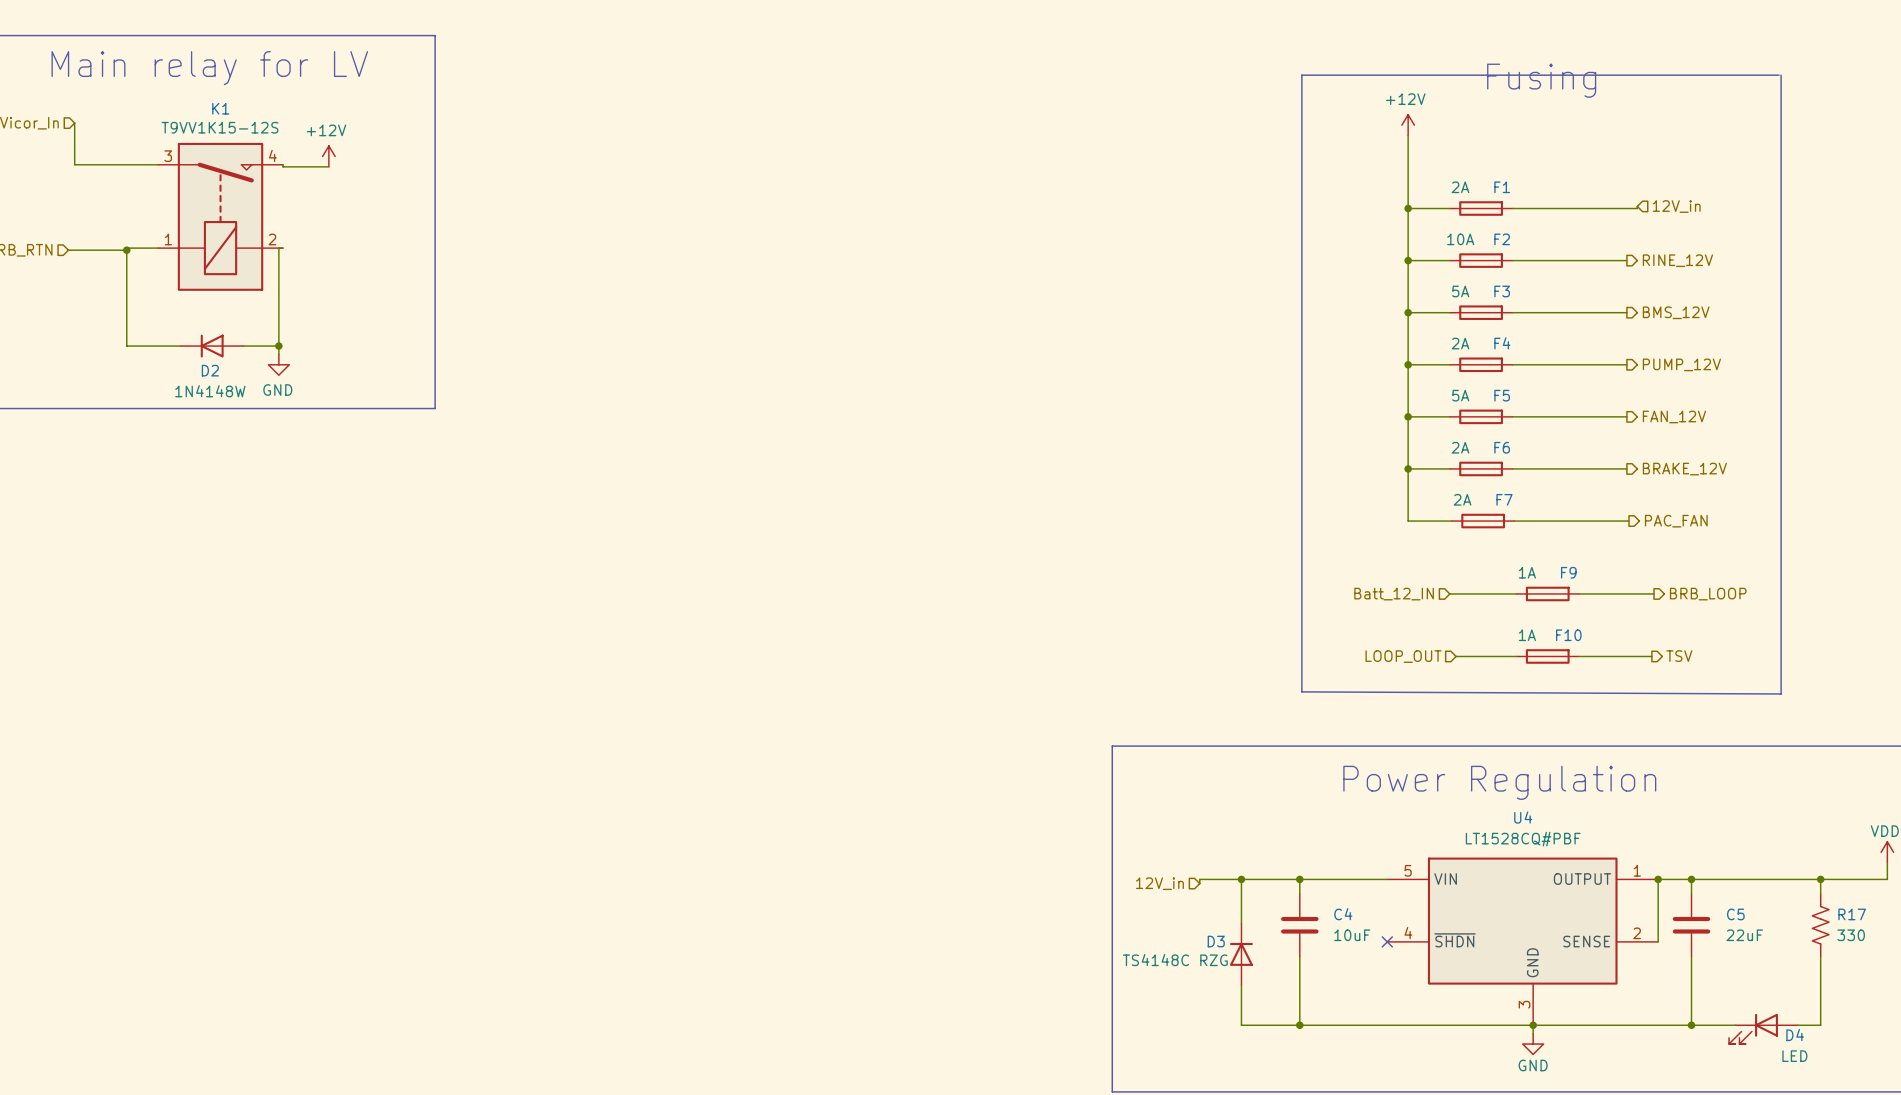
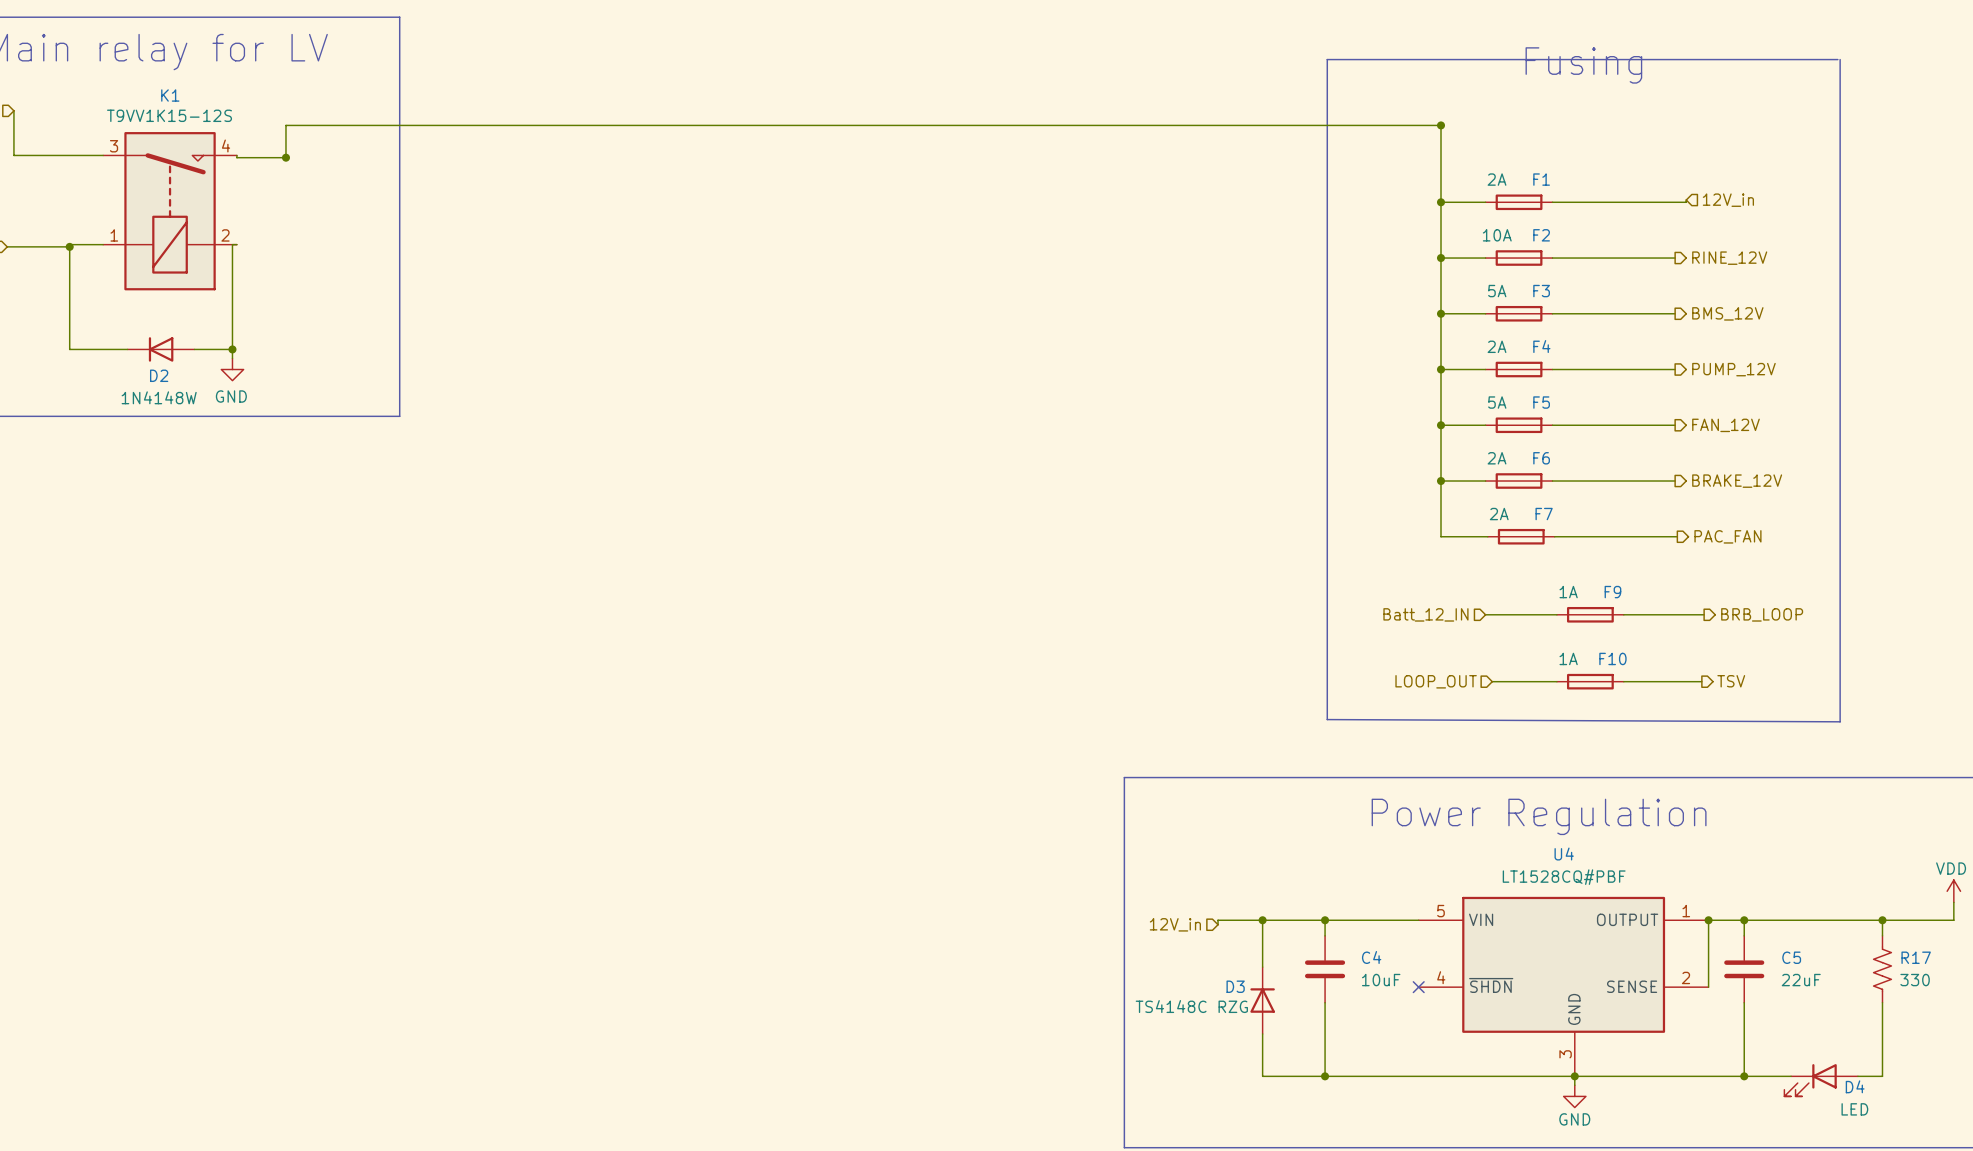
power symbol: +12V (1408, 125) -> none
wire: none -> (1441, 125) (285, 125) (285, 157)
junction: none -> (1441, 125)
power symbol: +12V (328, 156) -> none
junction: none -> (285, 157)

